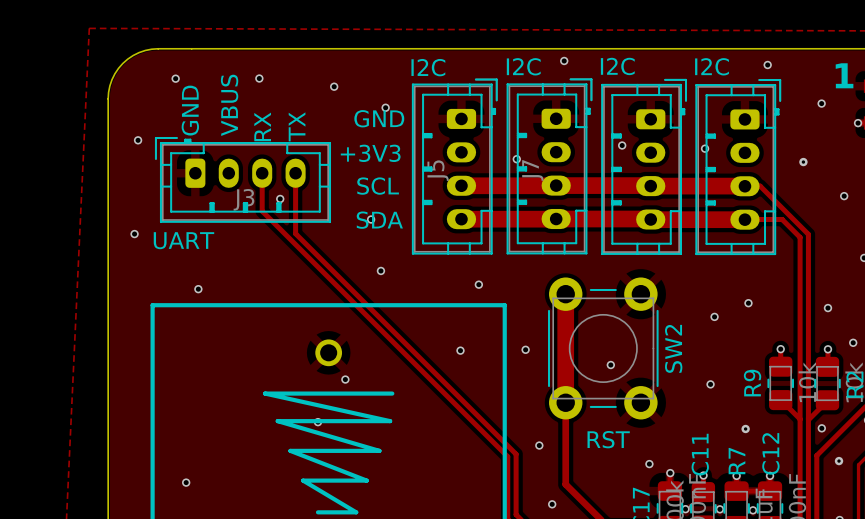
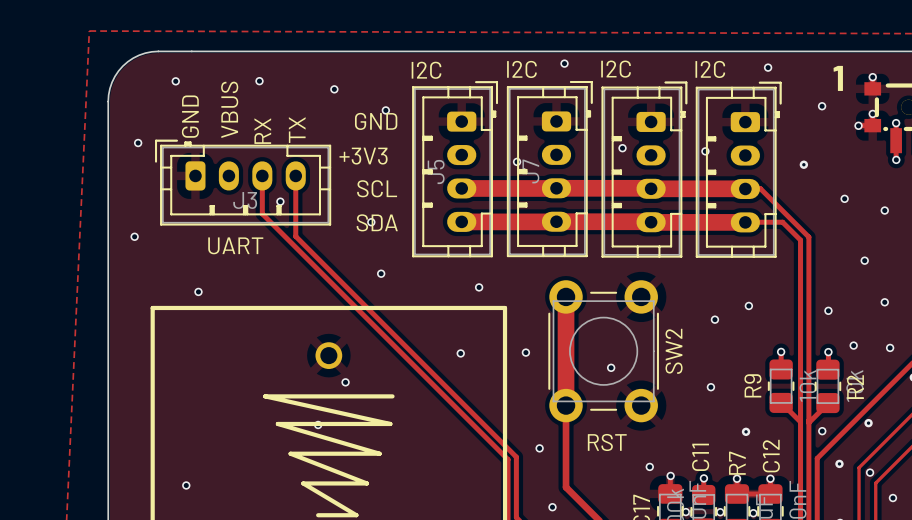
text position: UART (183, 240) -> UART (235, 245)

